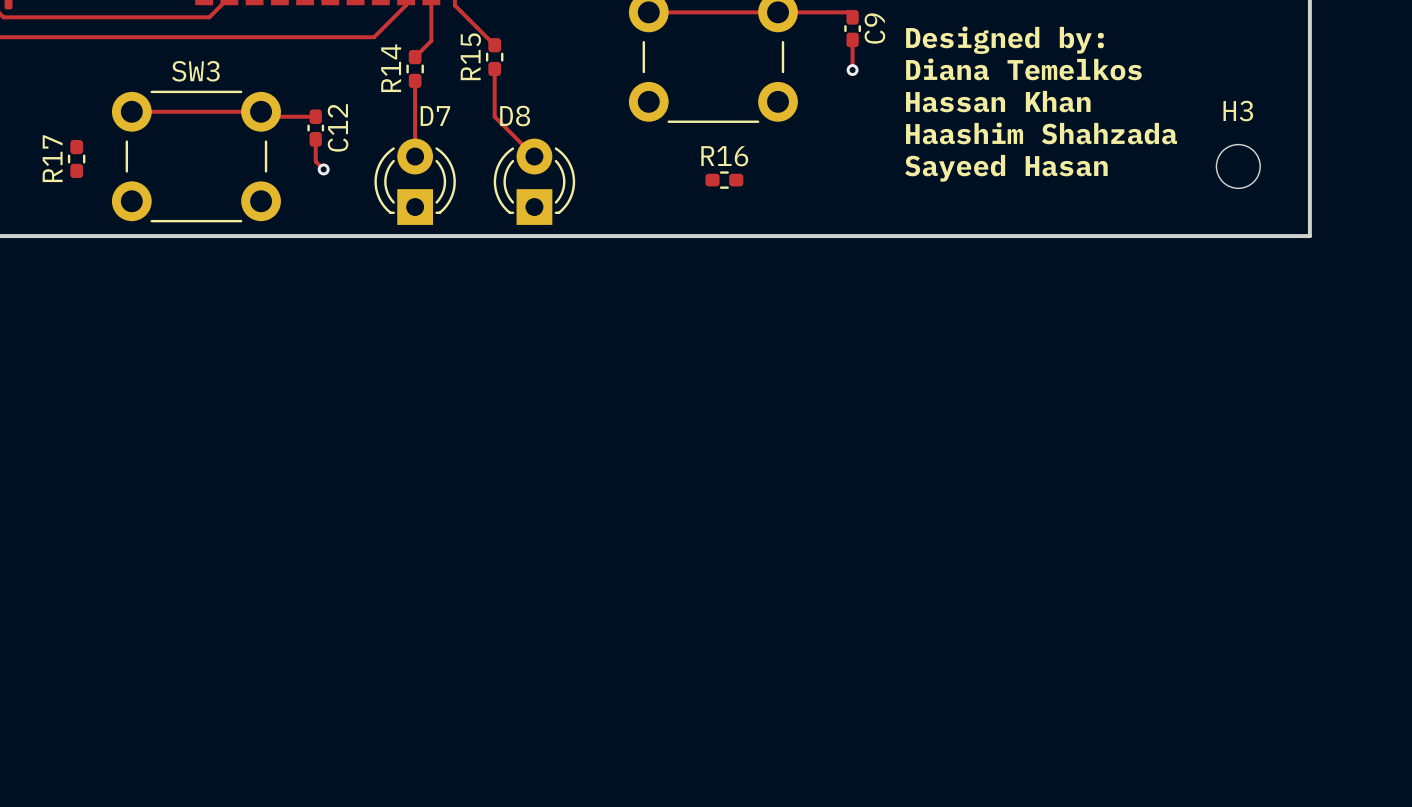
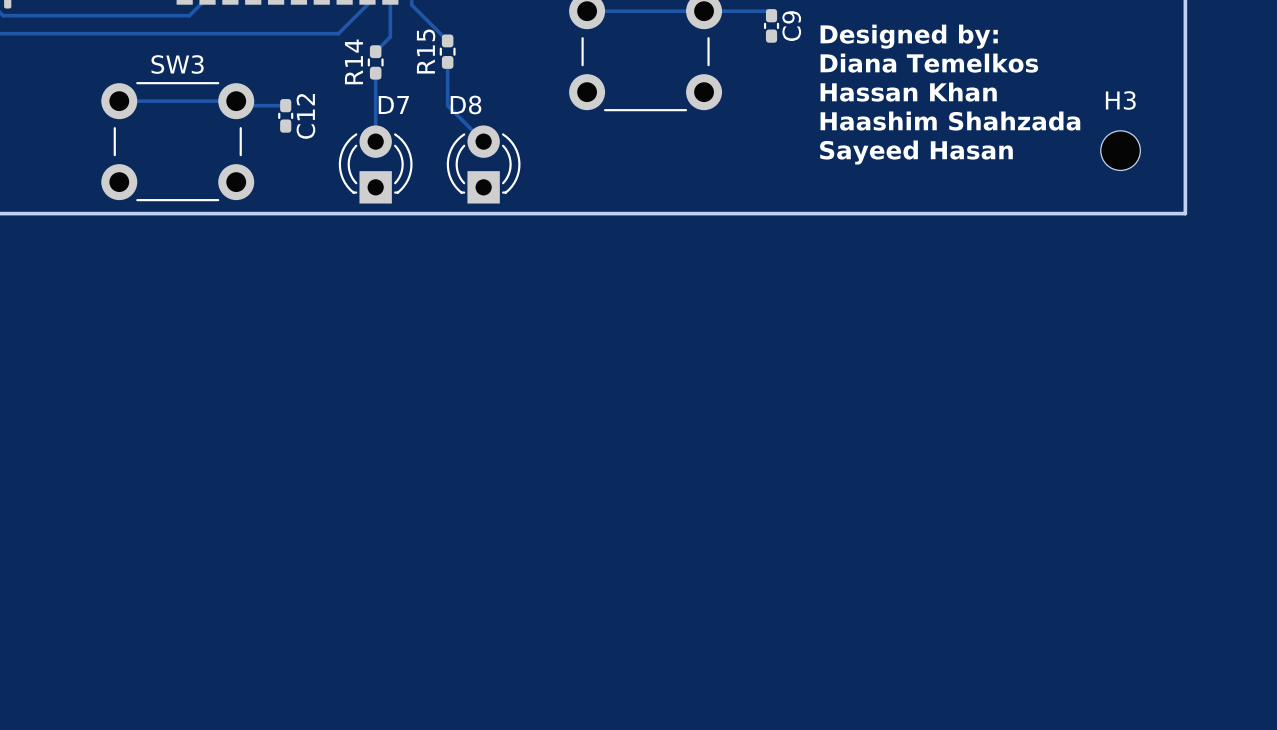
track: (852, 39) (852, 70) -> none
via: (852, 70) -> none
track: (315, 139) (315, 161) (323, 169) -> none
R17: (76, 159) -> none
via: (323, 169) -> none
R16: (724, 180) -> none

